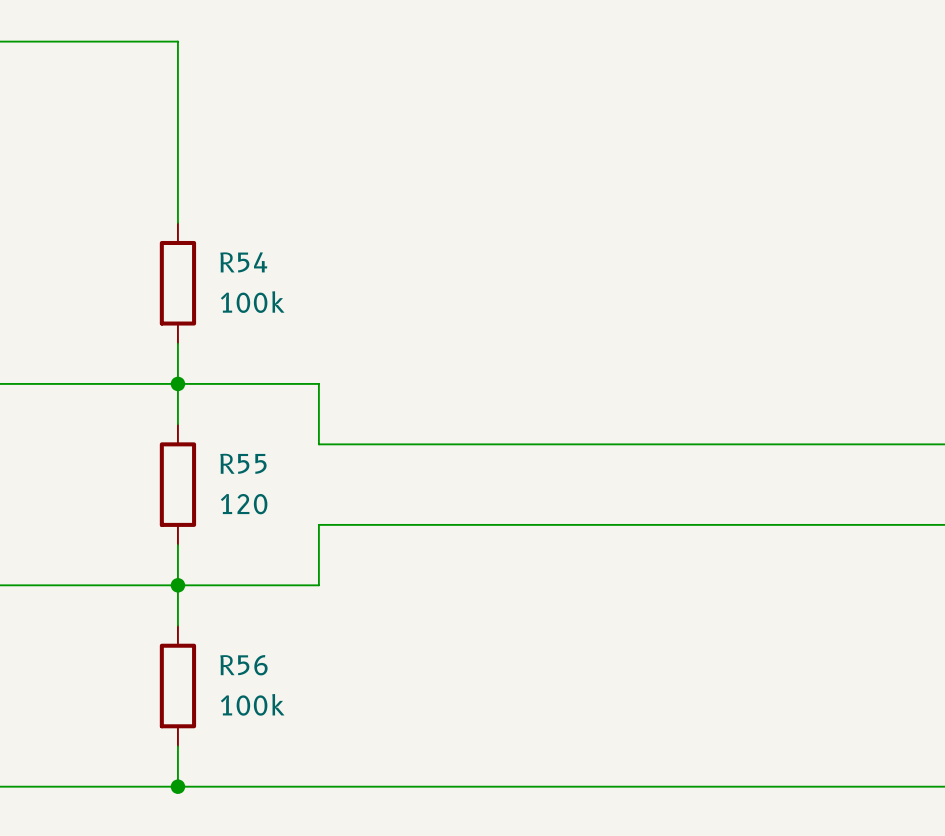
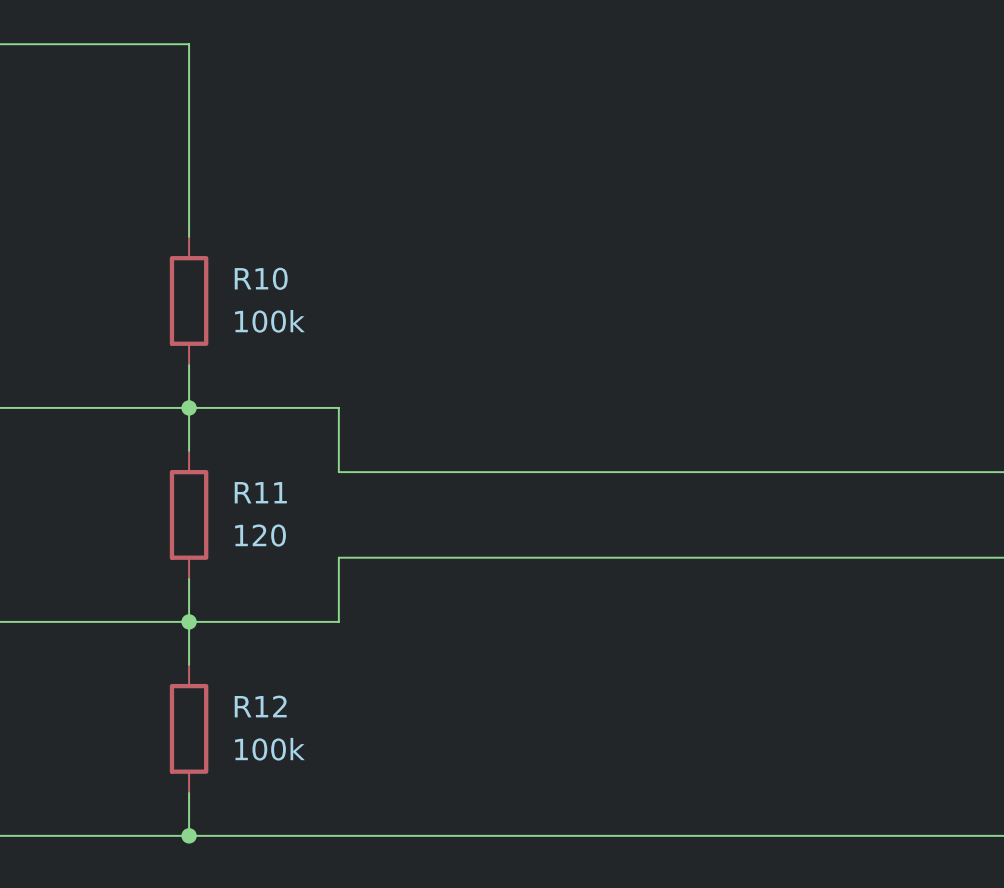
R54 name: R54 (243, 262) -> R10 (261, 278)
R55 name: R55 (243, 463) -> R11 (260, 492)
R56 name: R56 (243, 665) -> R12 (260, 706)

